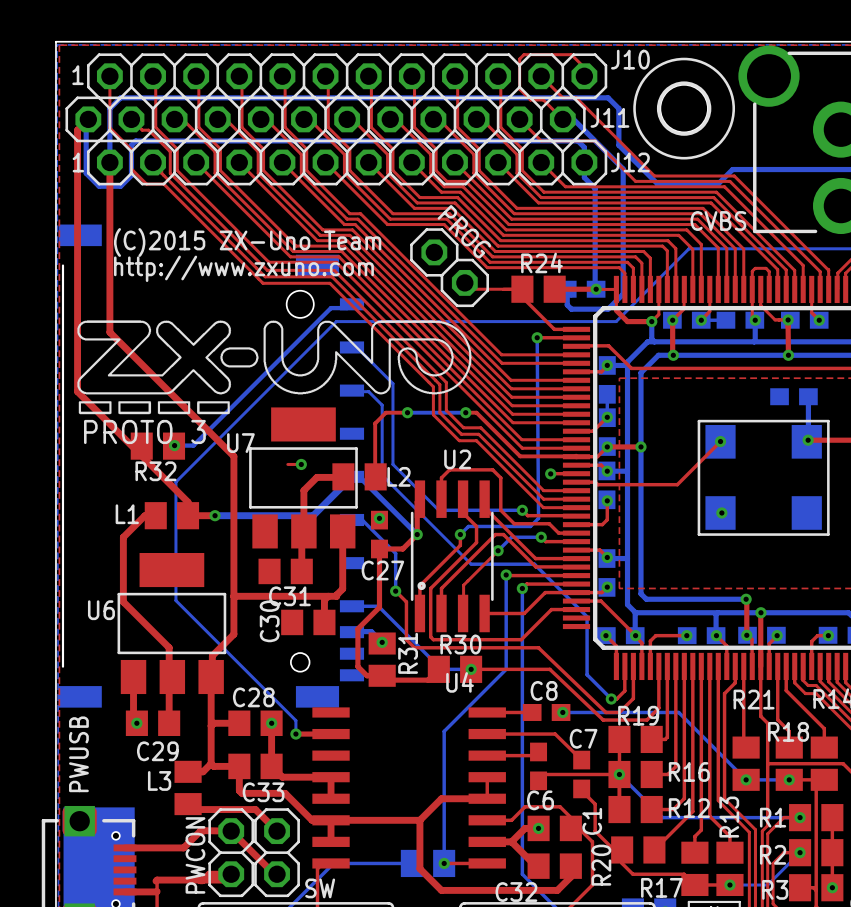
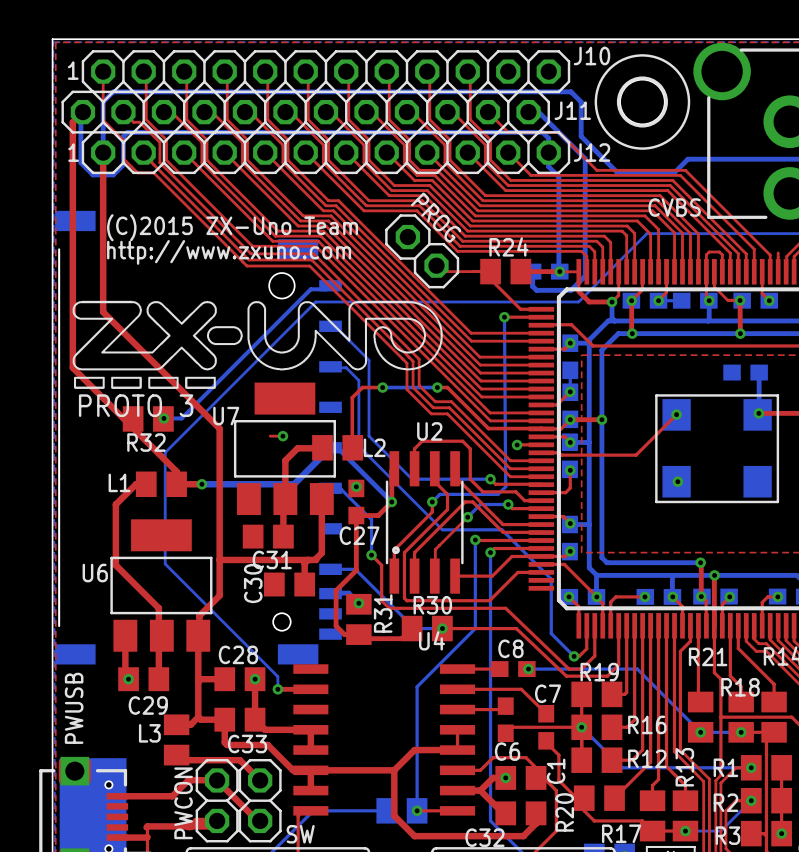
top track: (541, 76) (562, 97) (576, 97) (654, 176) (734, 176) (828, 270) -> none
top track: (584, 76) (584, 67) (571, 54) (523, 54) (519, 59) (519, 89) (530, 99) (543, 99) (562, 119) -> none

